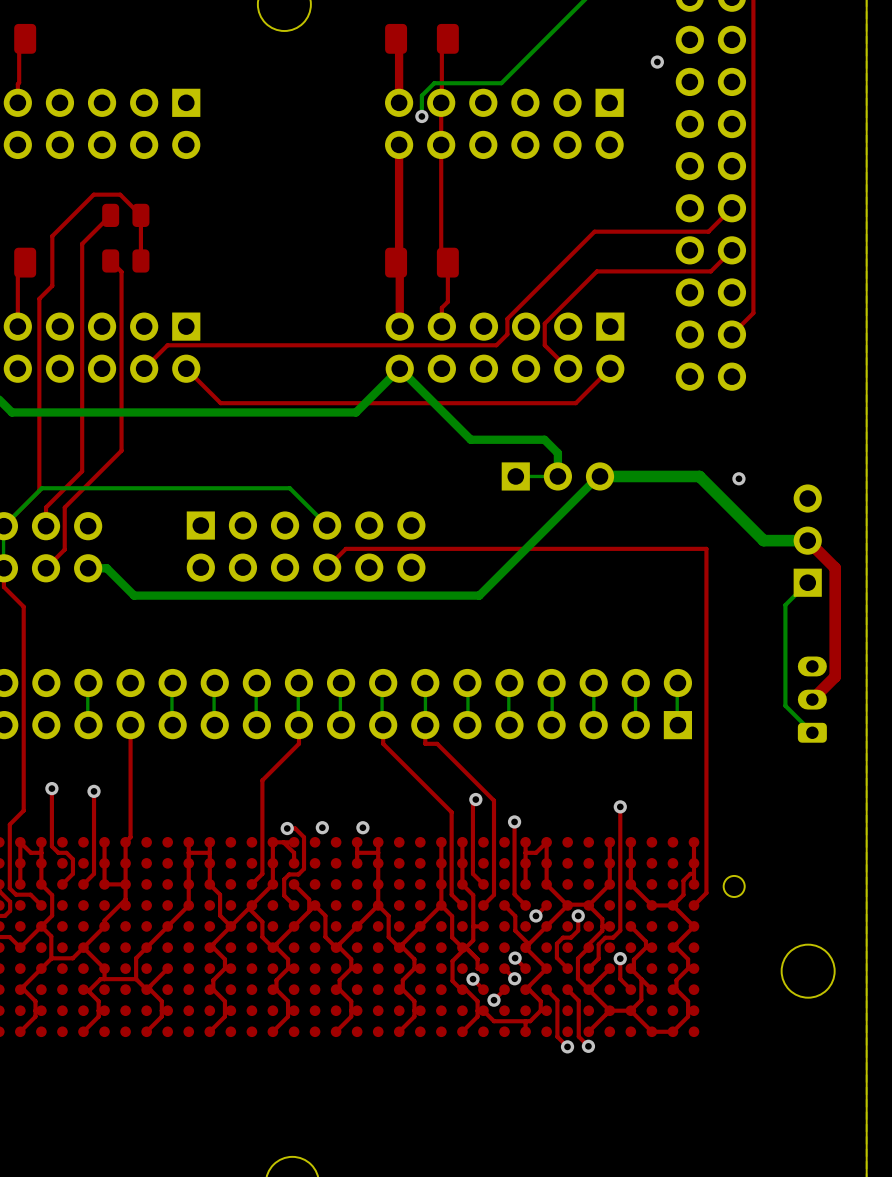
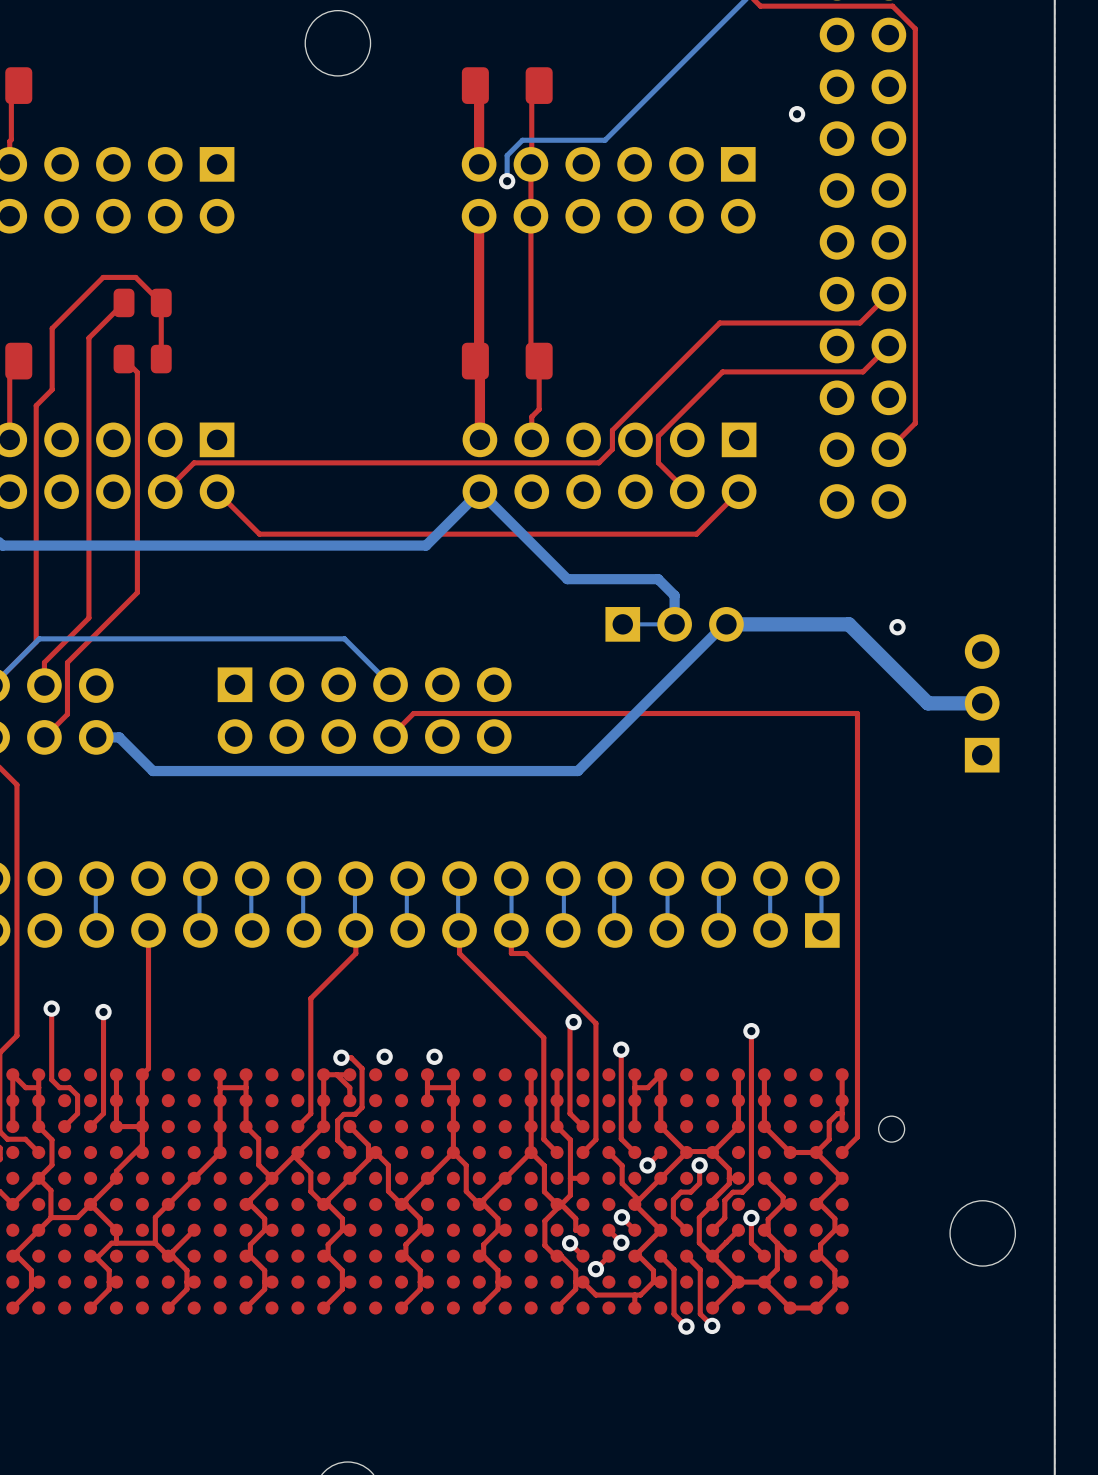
top track: (807, 540) (835, 568) (835, 676) (812, 699) -> none
bottom track: (807, 582) (785, 605) (785, 705) (812, 732) -> none
part: (812, 699) -> none

